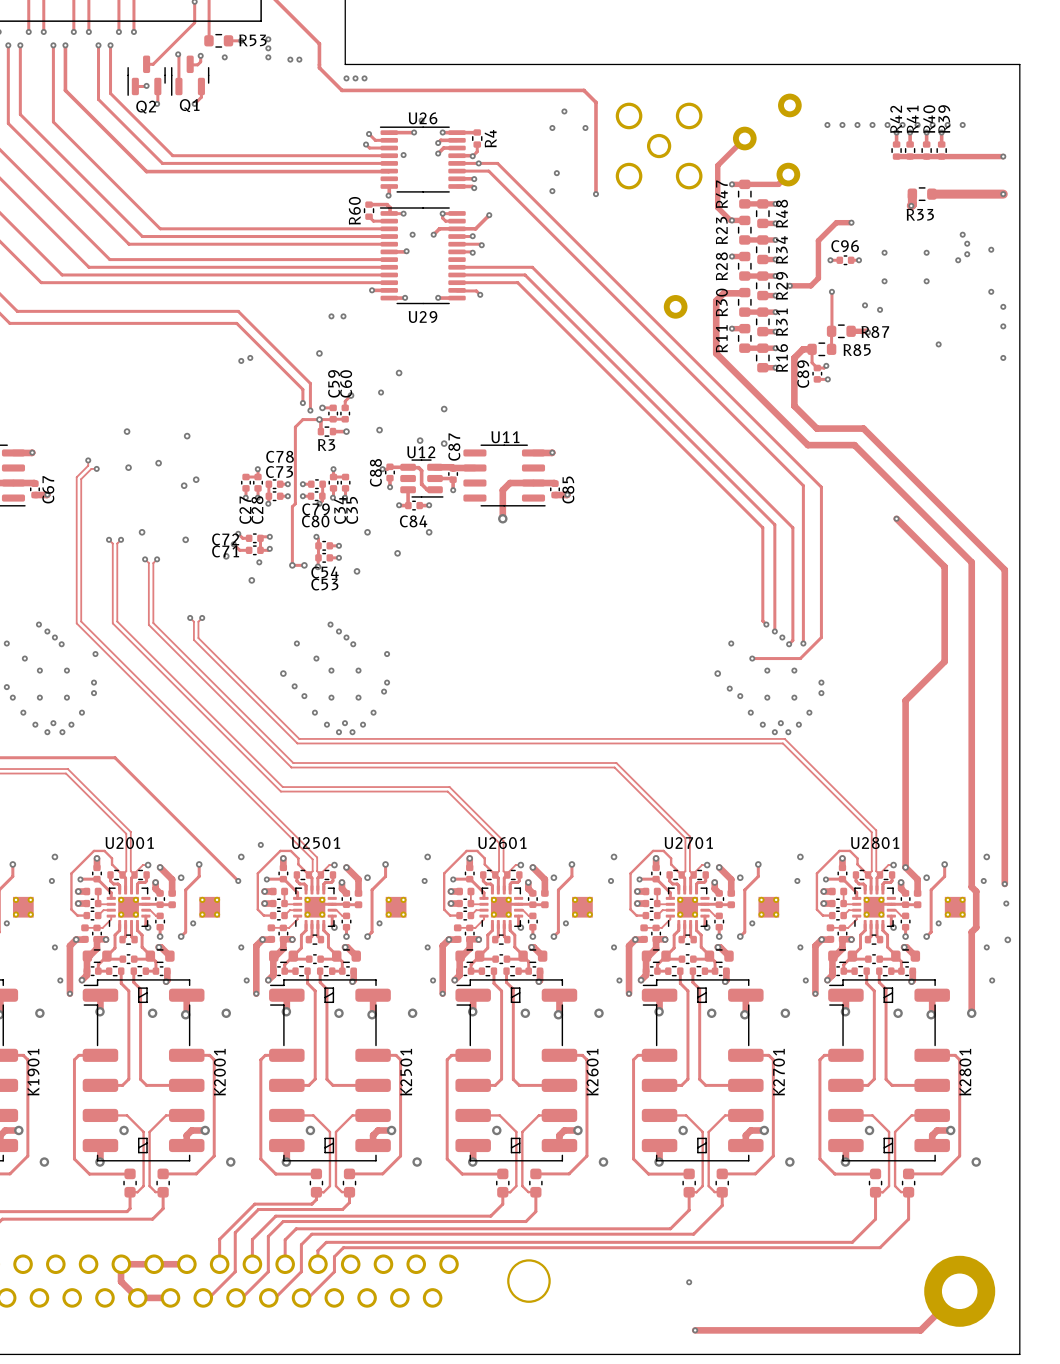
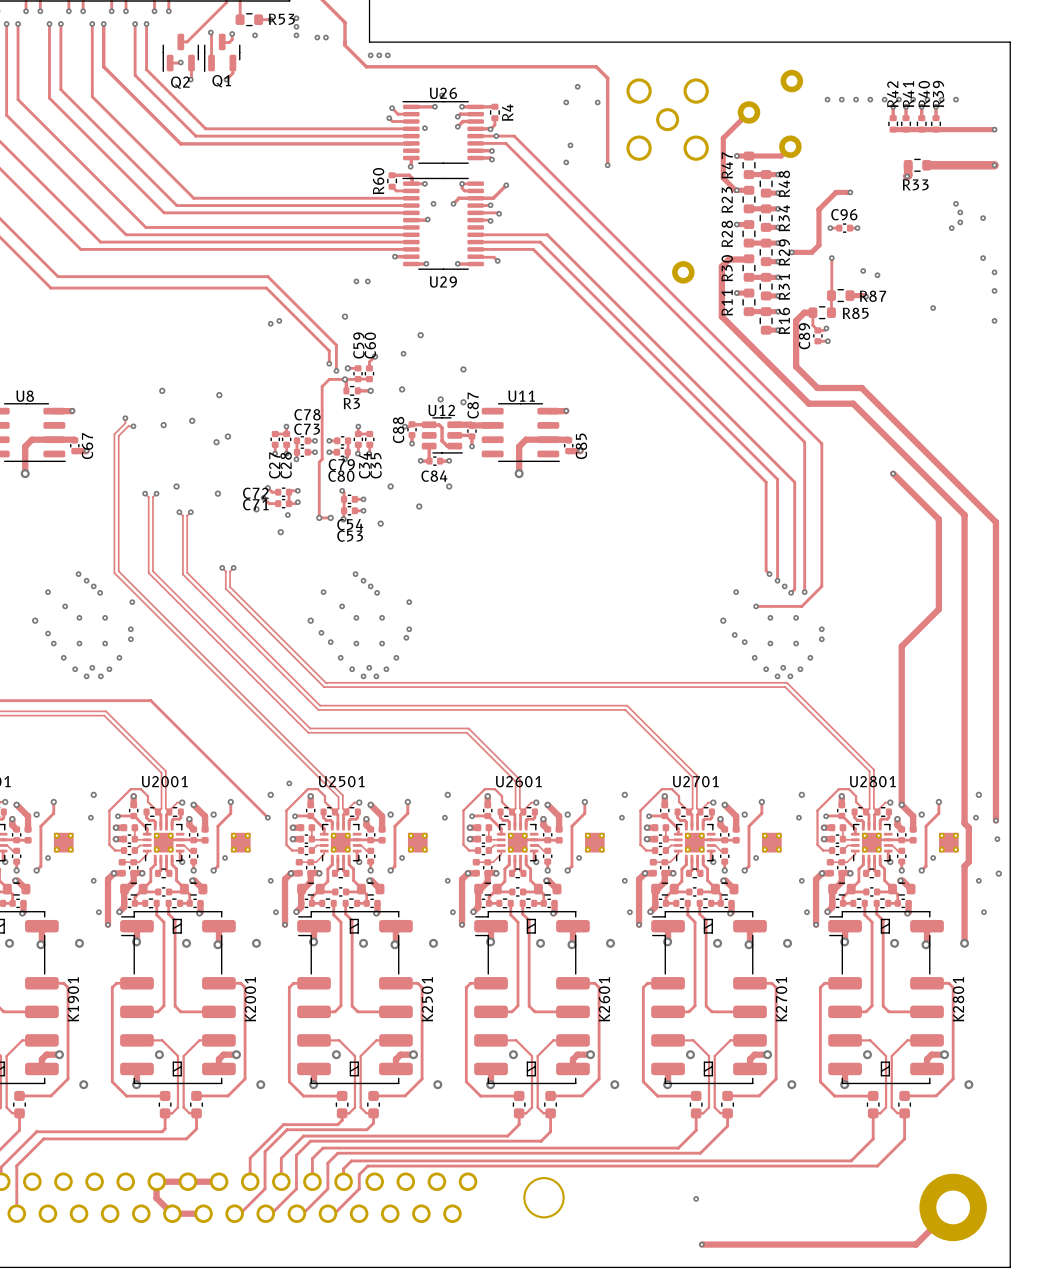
via: (884, 252) -> none
via: (926, 252) -> none
via: (884, 281) -> none
via: (926, 281) -> none

